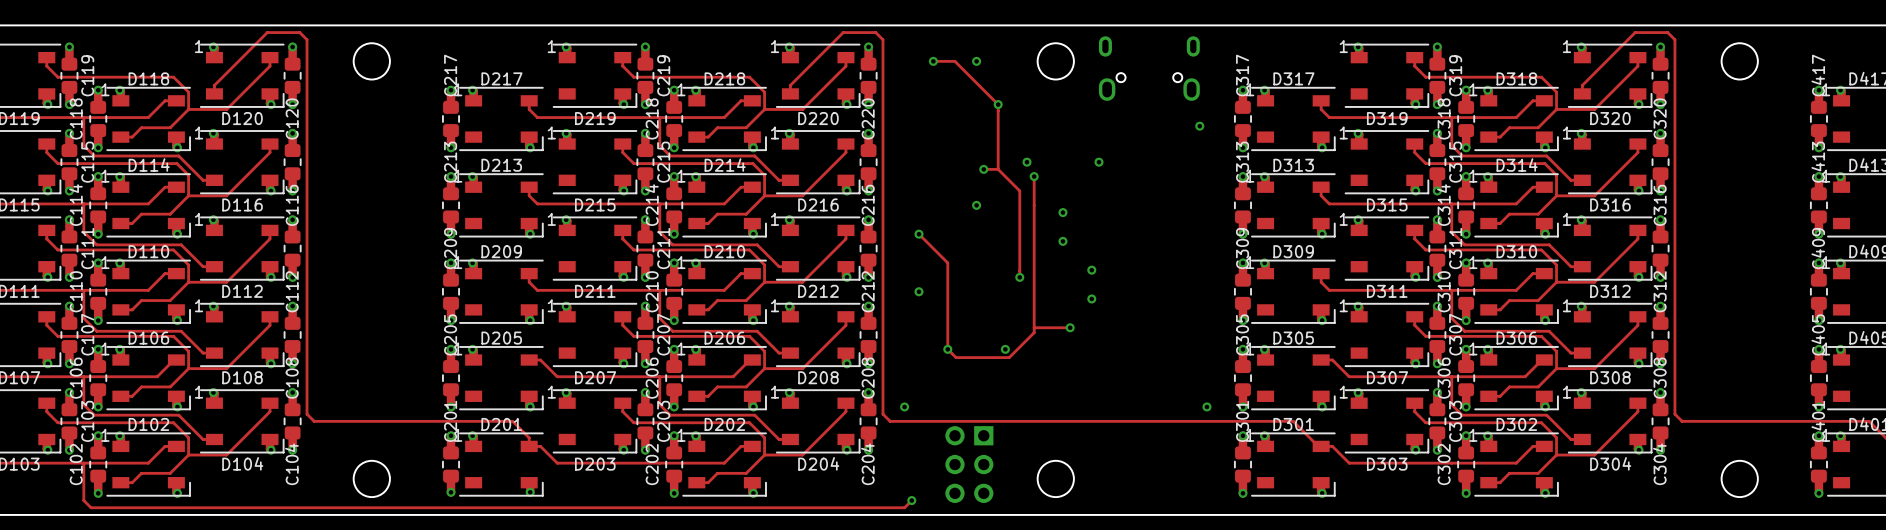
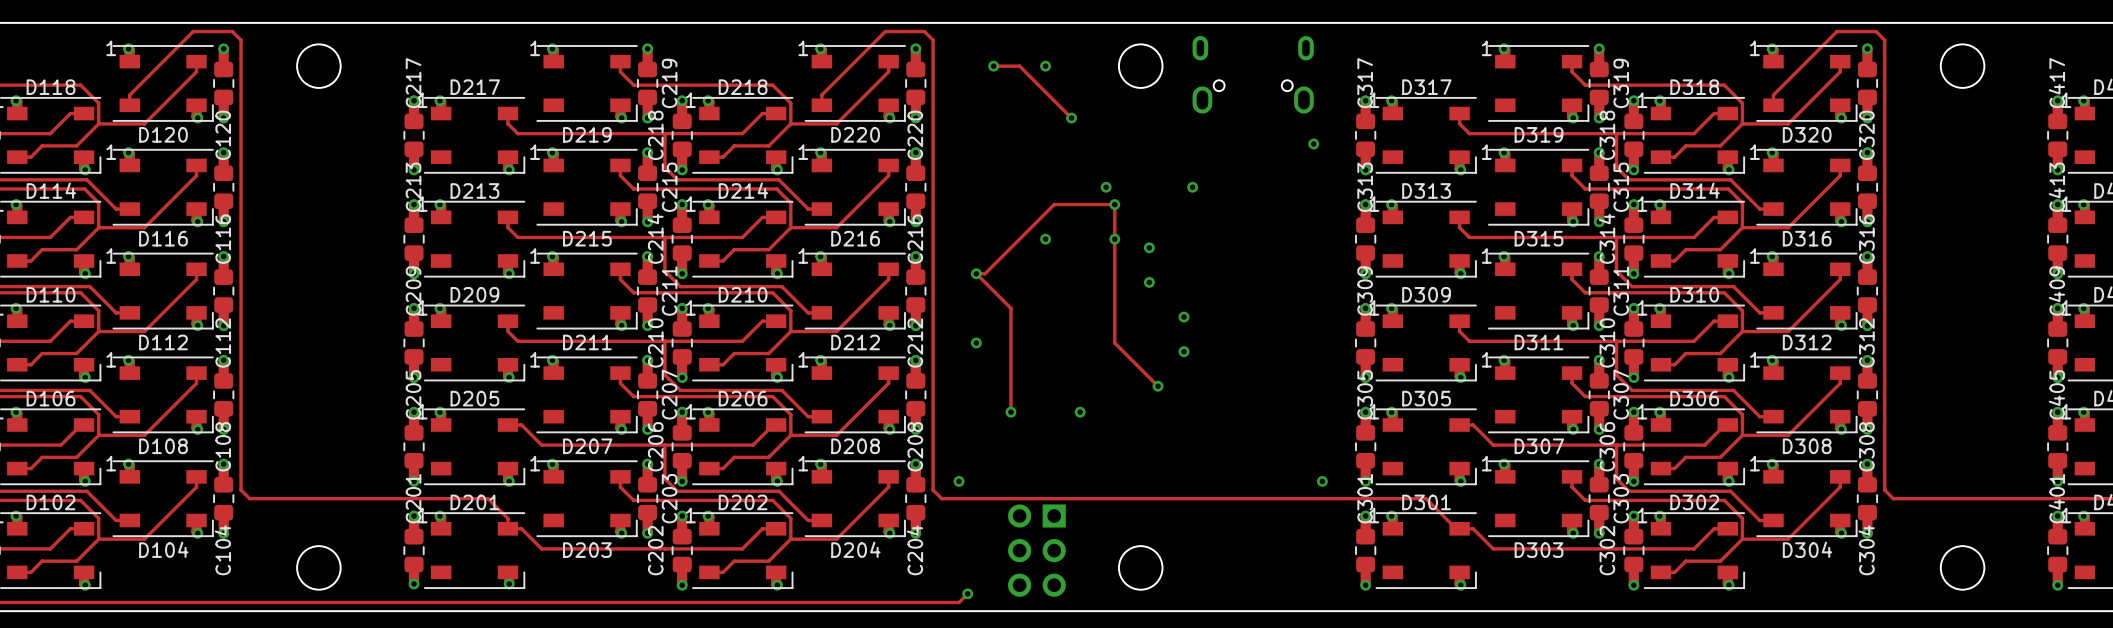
track: (998, 104) (998, 169) -> none
track: (983, 169) (998, 169) (1019, 190) (1019, 277) -> none
via: (983, 169) -> none
track: none -> (1114, 204) (1054, 204) (985, 273) (976, 273)
via: none -> (1114, 239)
via: (1019, 277) -> none
track: (1034, 291) (1034, 332) (1009, 357) (956, 357) (947, 349) -> none
track: (1034, 327) (1070, 327) -> (1114, 342) (1158, 386)

